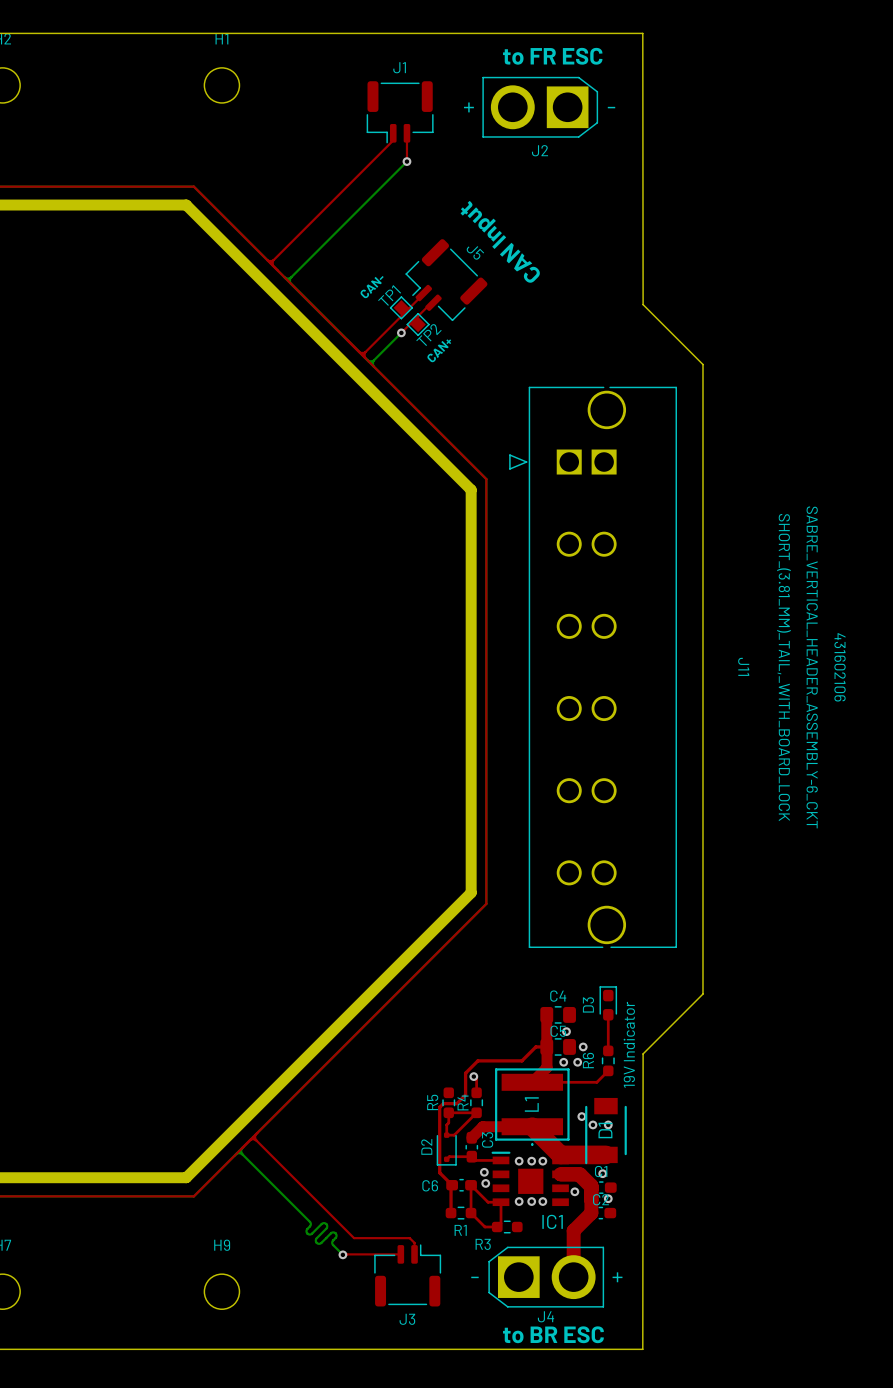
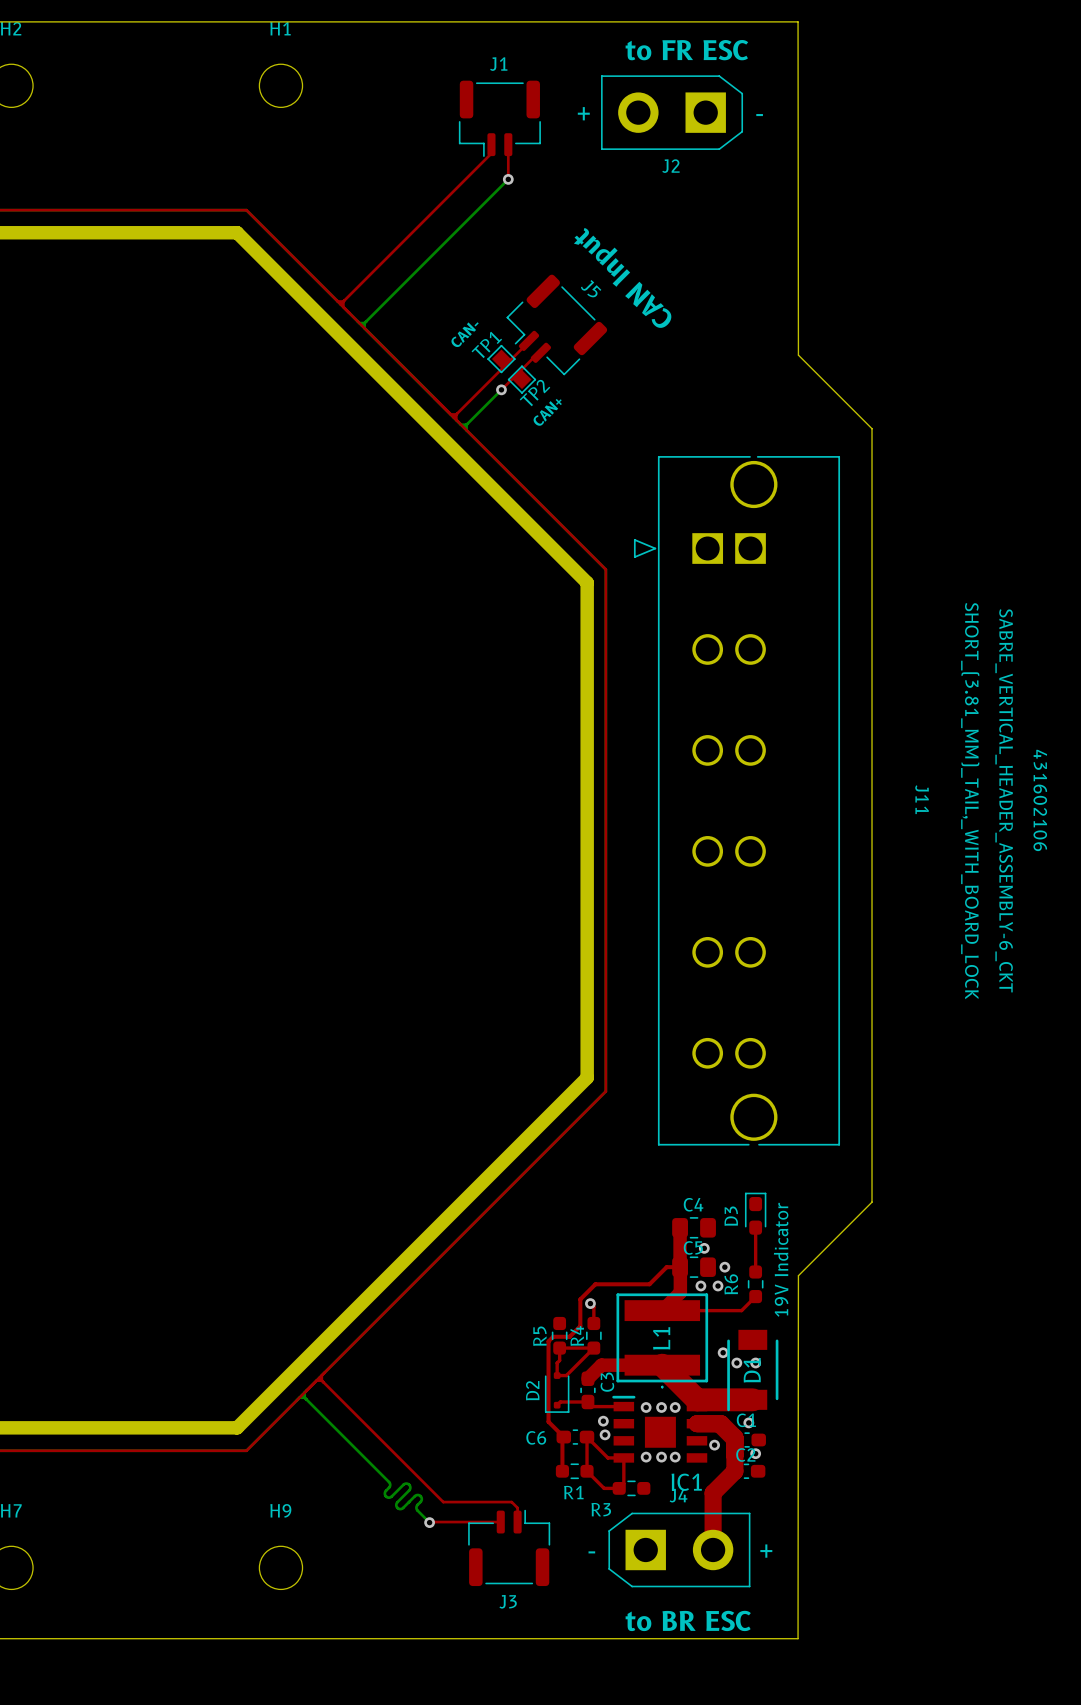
J2 footprint: [482, 76, 599, 138] -> [601, 75, 744, 150]
J4 footprint: [488, 1246, 605, 1308] -> [608, 1512, 751, 1588]
J4 name position: J4 (545, 1316) -> J4 (678, 1495)

